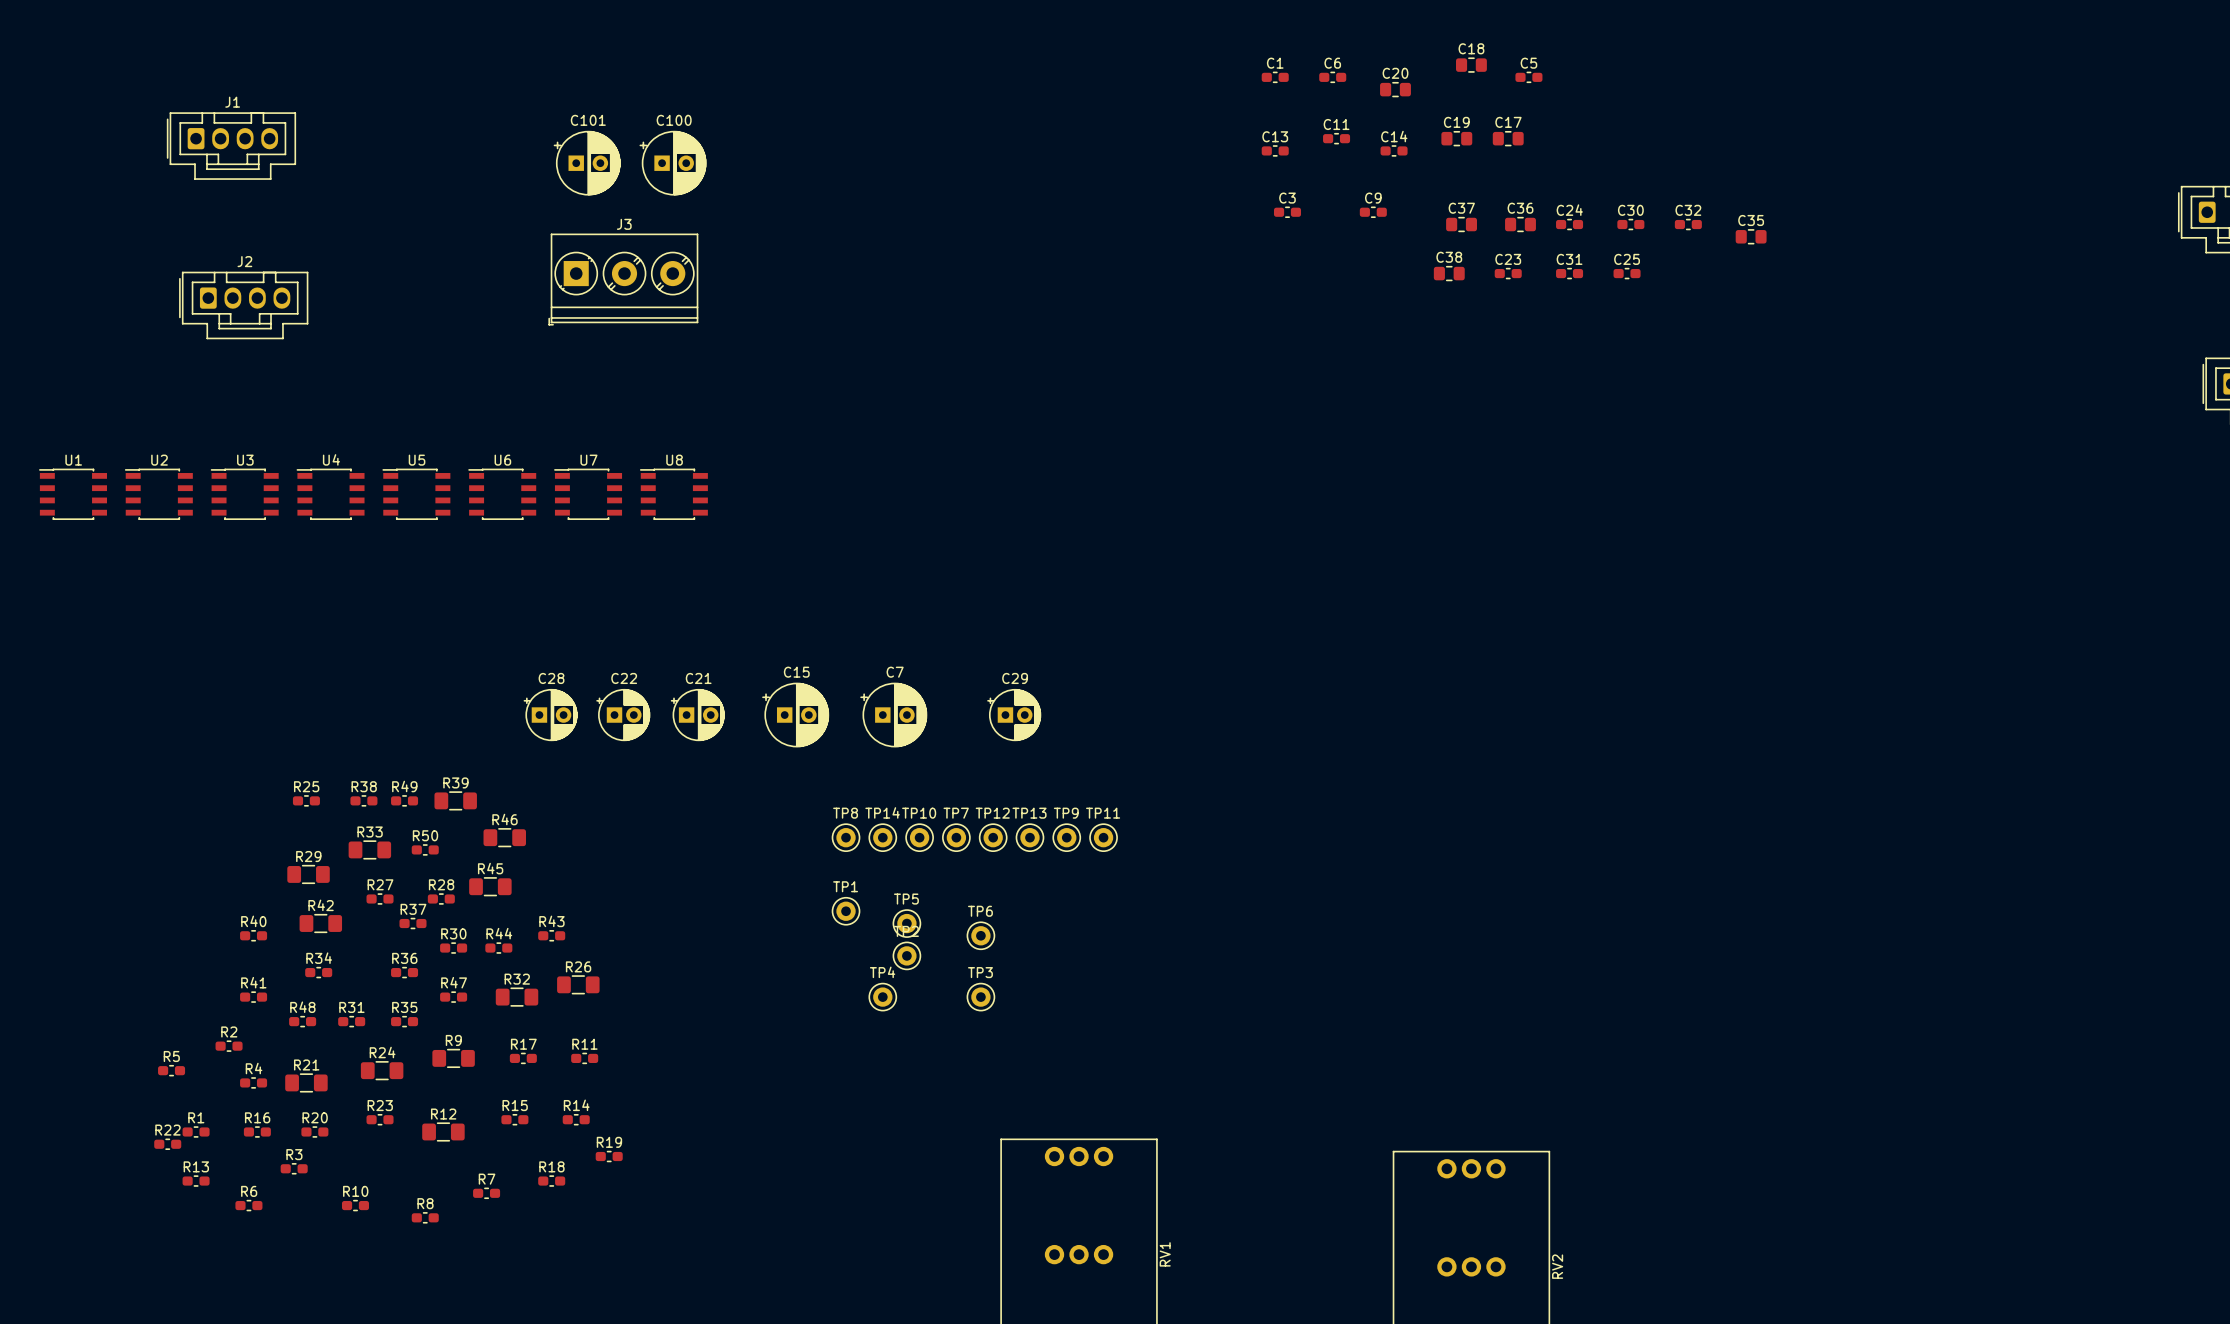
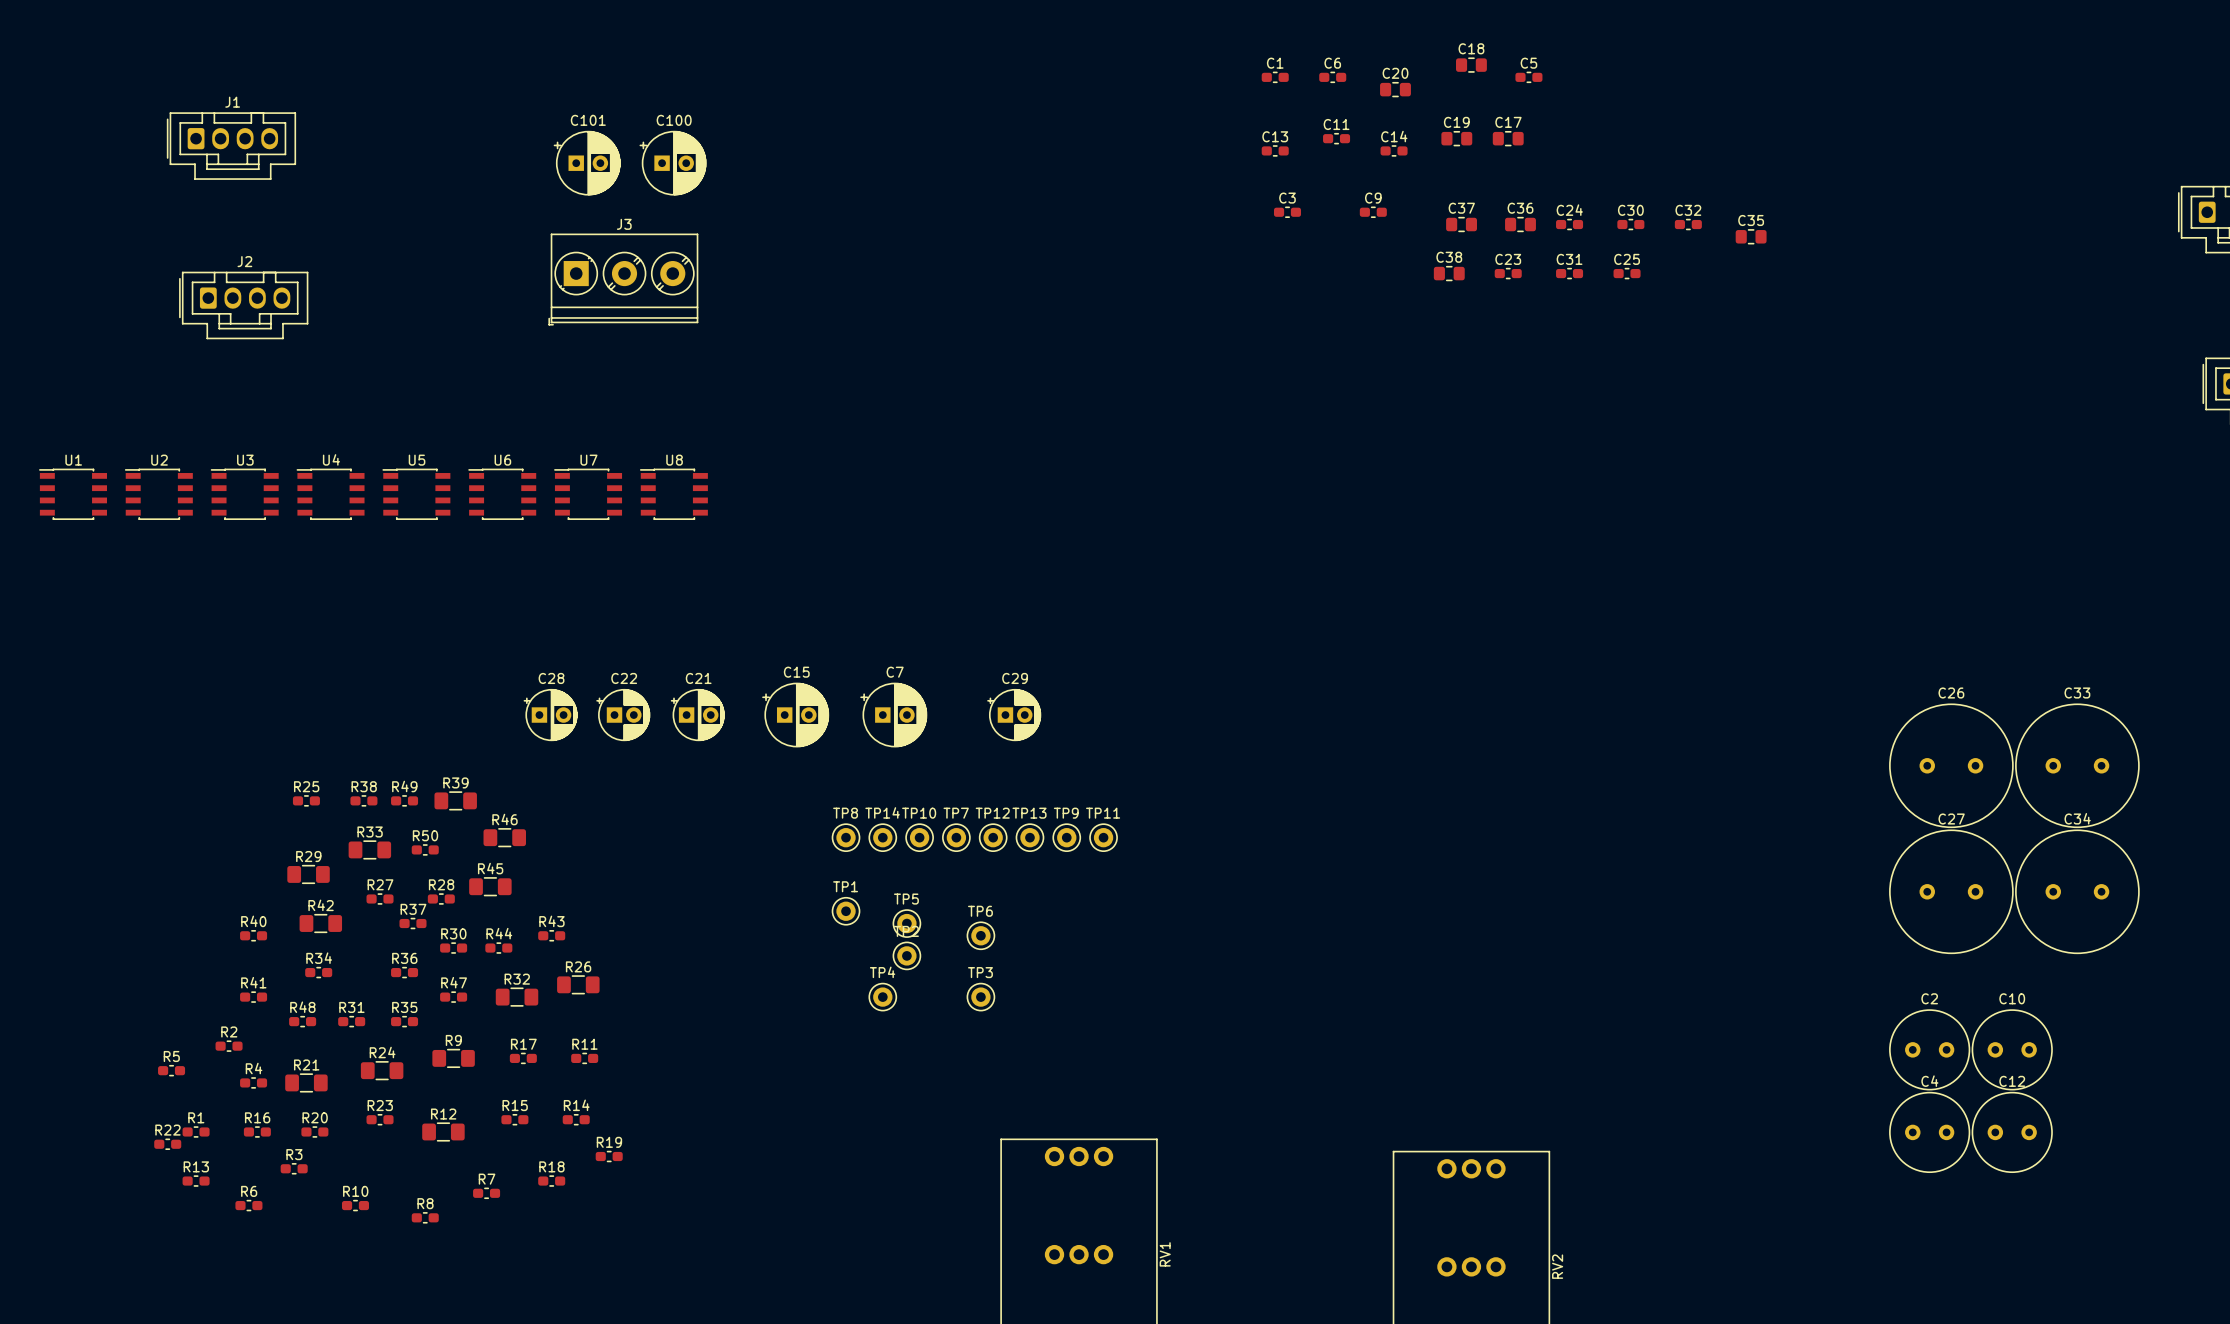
C26: none -> (1951, 765)
C33: none -> (2077, 765)
C27: none -> (1951, 891)
C34: none -> (2077, 891)
C2: none -> (1929, 1049)
C10: none -> (2012, 1049)
C4: none -> (1929, 1132)
C12: none -> (2012, 1132)

